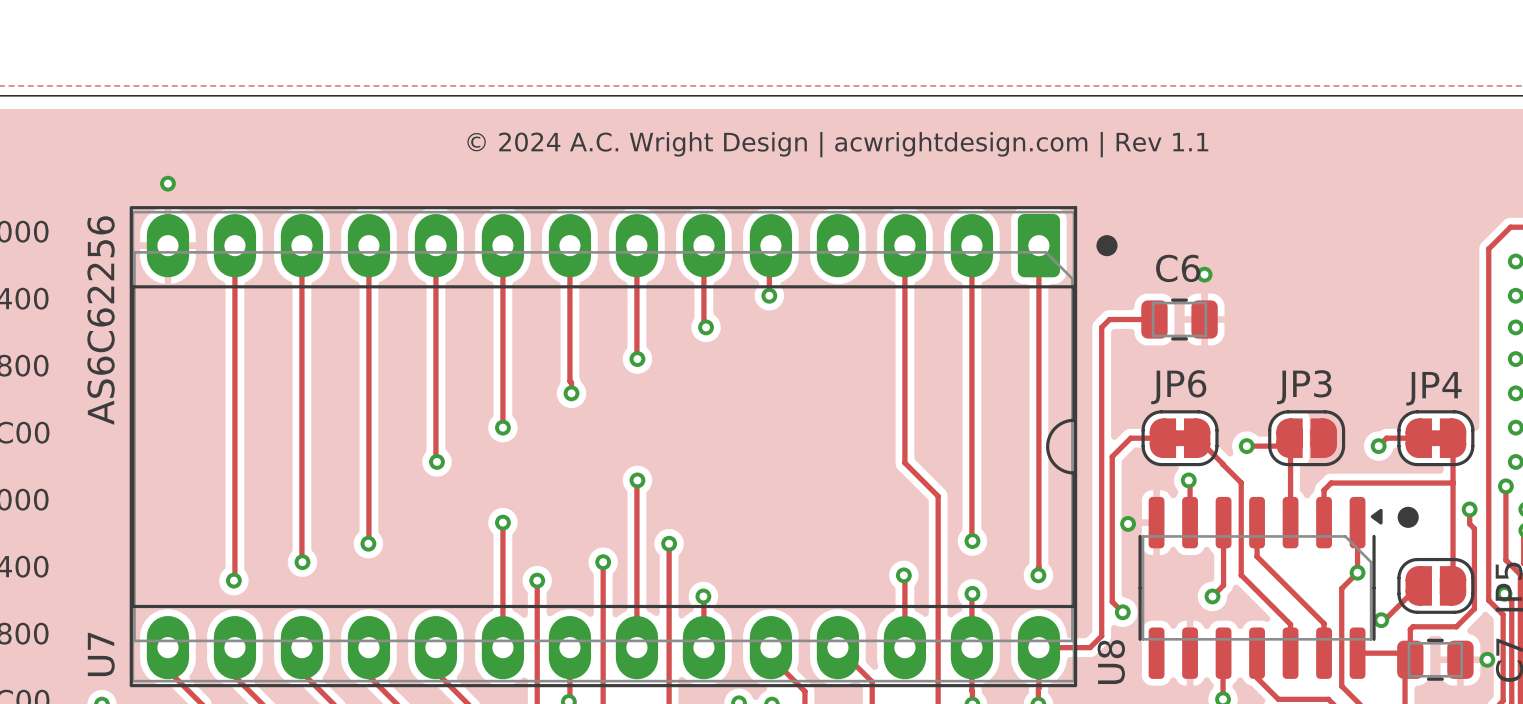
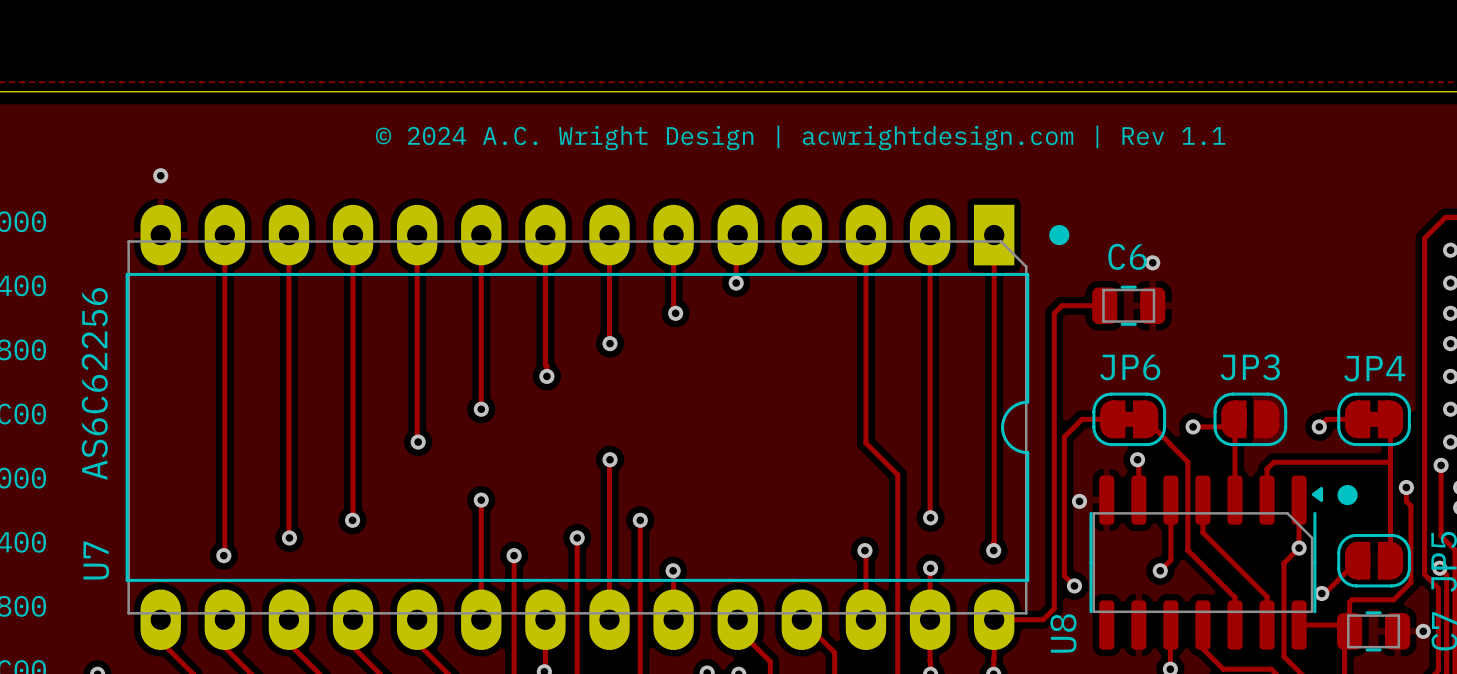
U7 footprint: [129, 206, 1078, 688] -> [125, 204, 1030, 651]
U7 value position: AS6C62256 (101, 320) -> AS6C62256 (94, 383)
U7 name position: U7 (101, 654) -> U7 (96, 560)

